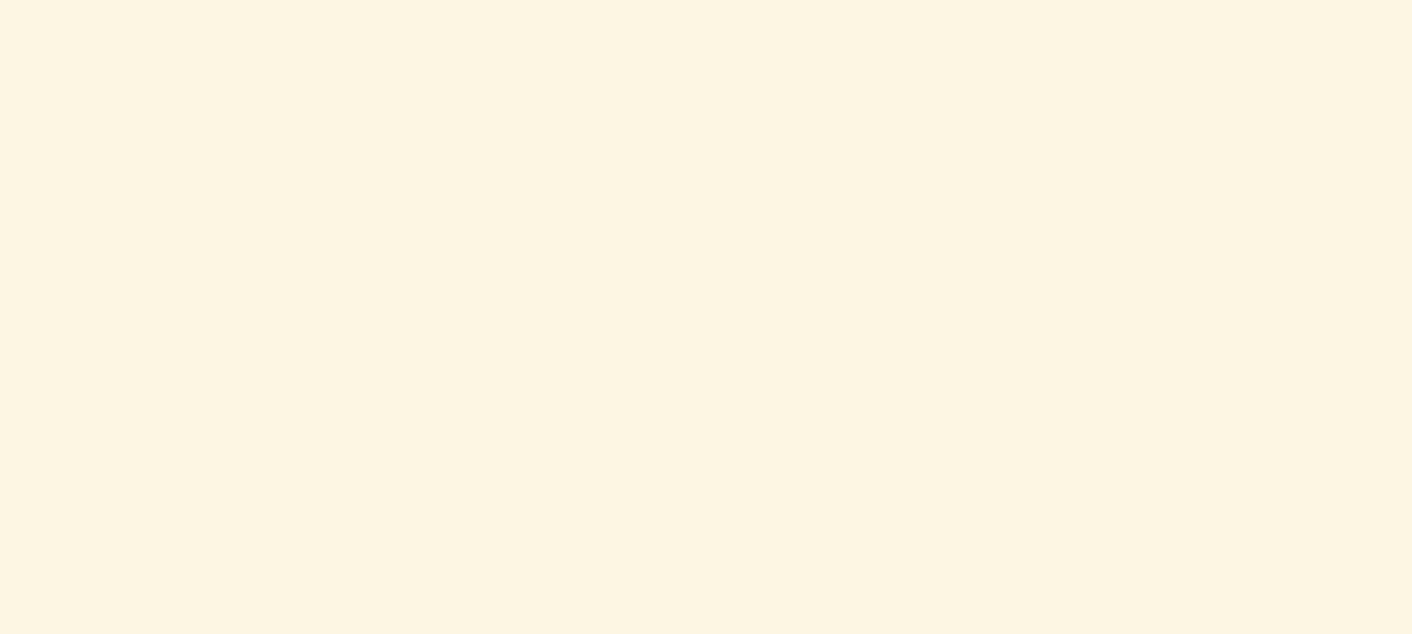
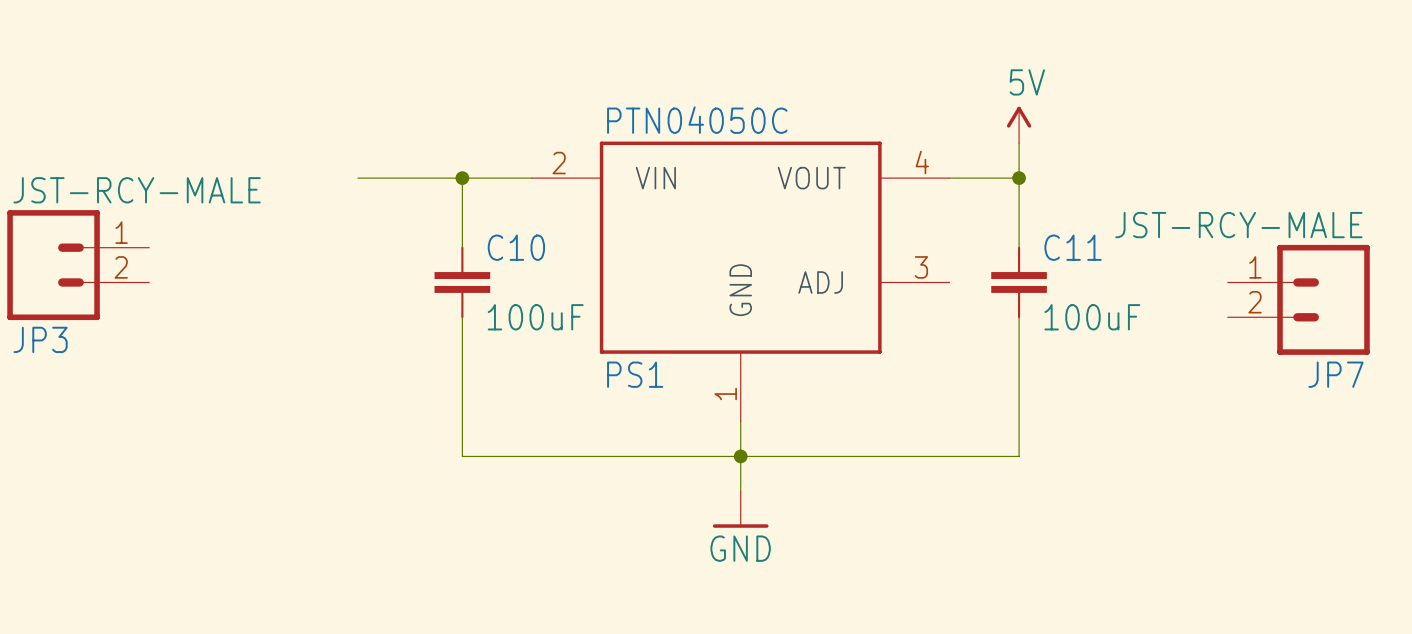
power symbol: none -> 5V (1019, 125)
wire: none -> (1019, 143) (1019, 247)
wire: none -> (358, 178) (531, 178)
wire: none -> (462, 178) (462, 247)
junction: none -> (462, 178)
wire: none -> (949, 178) (1019, 178)
junction: none -> (1019, 178)
JP3: none -> JST-RCY-MALE (78, 265)
PS1: none -> PTN04050C (740, 281)
C10: none -> 100uF (462, 282)
C11: none -> 100uF (1019, 282)
JP7: none -> JST-RCY-MALE (1298, 299)
wire: none -> (462, 317) (462, 456) (1019, 456) (1019, 317)
wire: none -> (740, 421) (740, 491)
junction: none -> (740, 456)
power symbol: none -> GND (740, 509)

